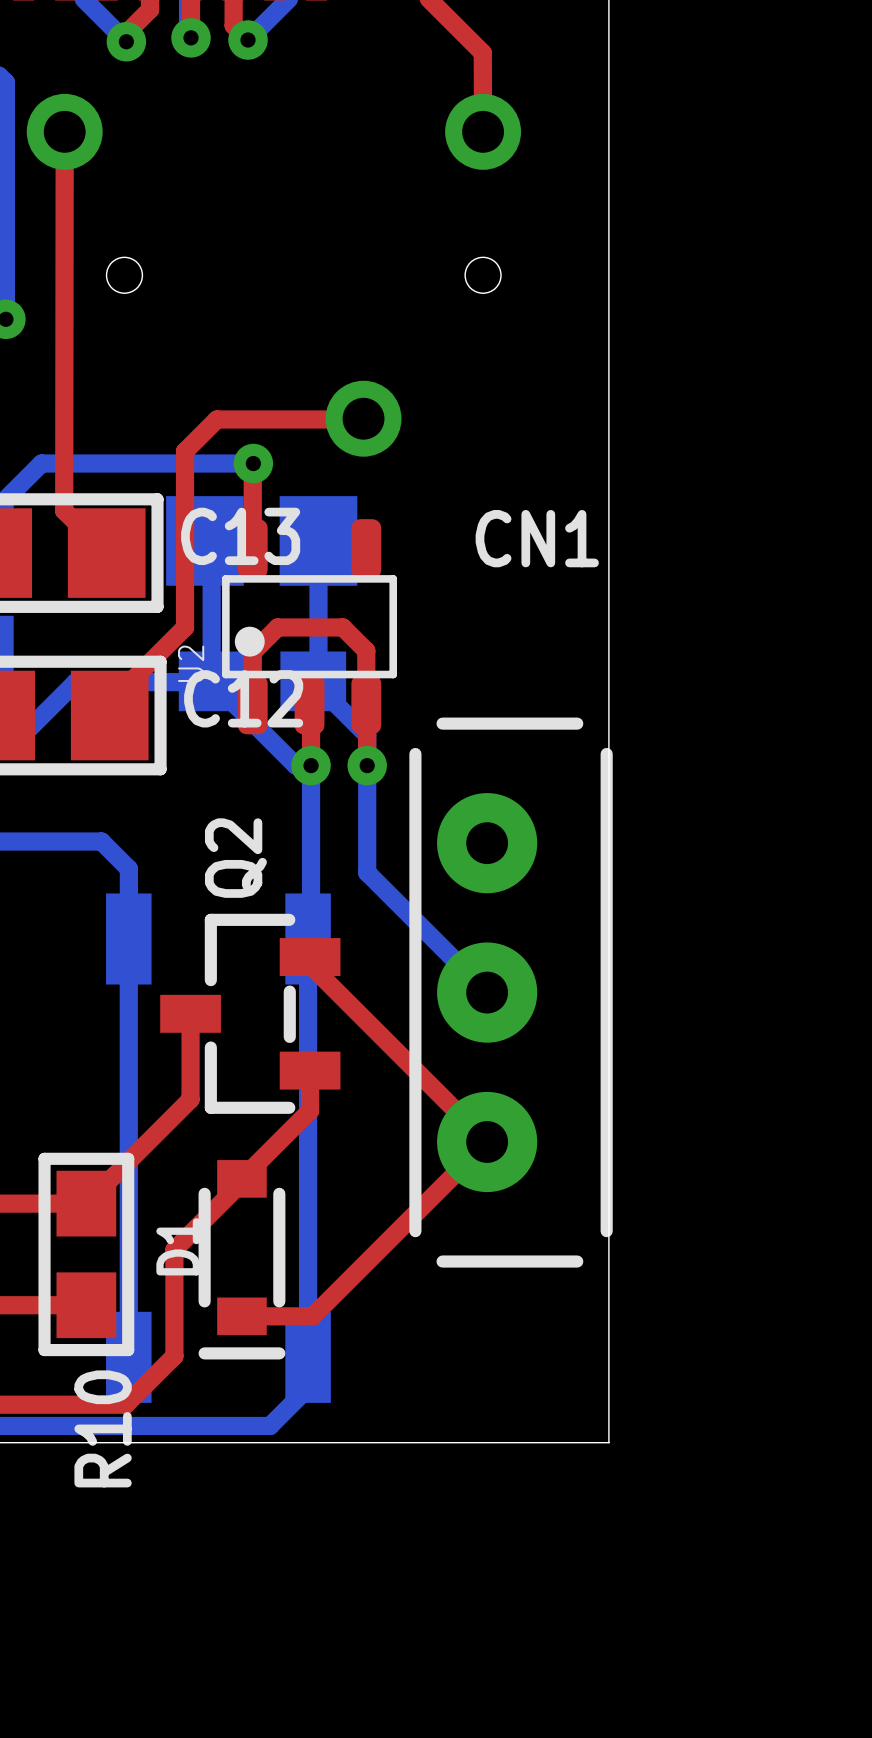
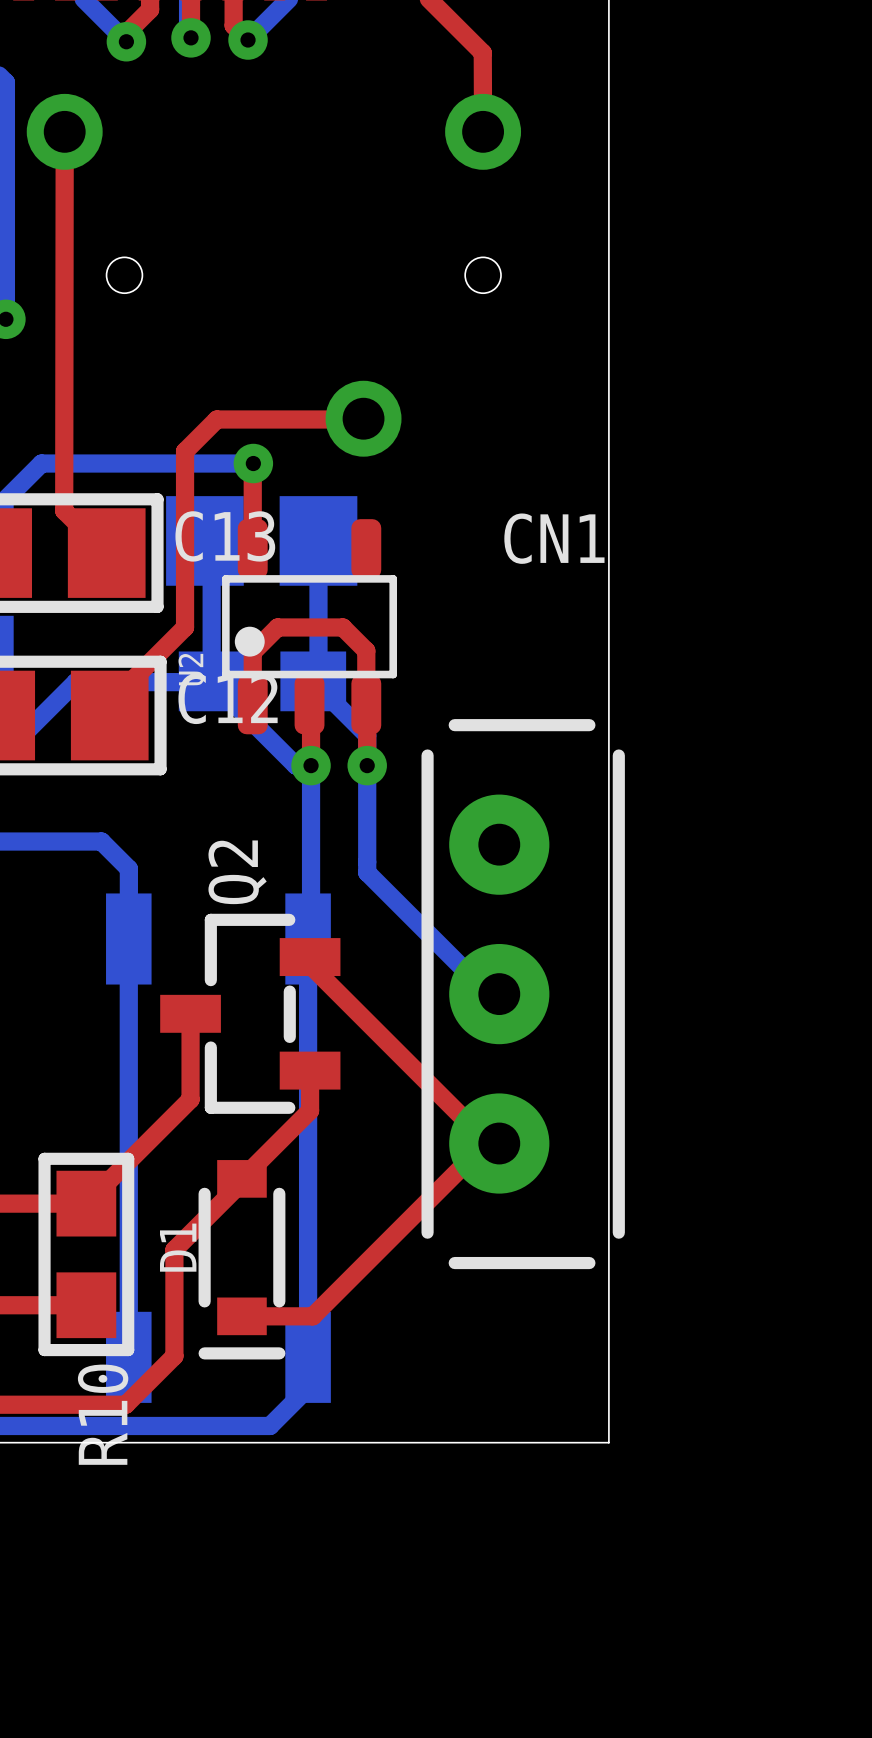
part position: (511, 992) -> (523, 994)

